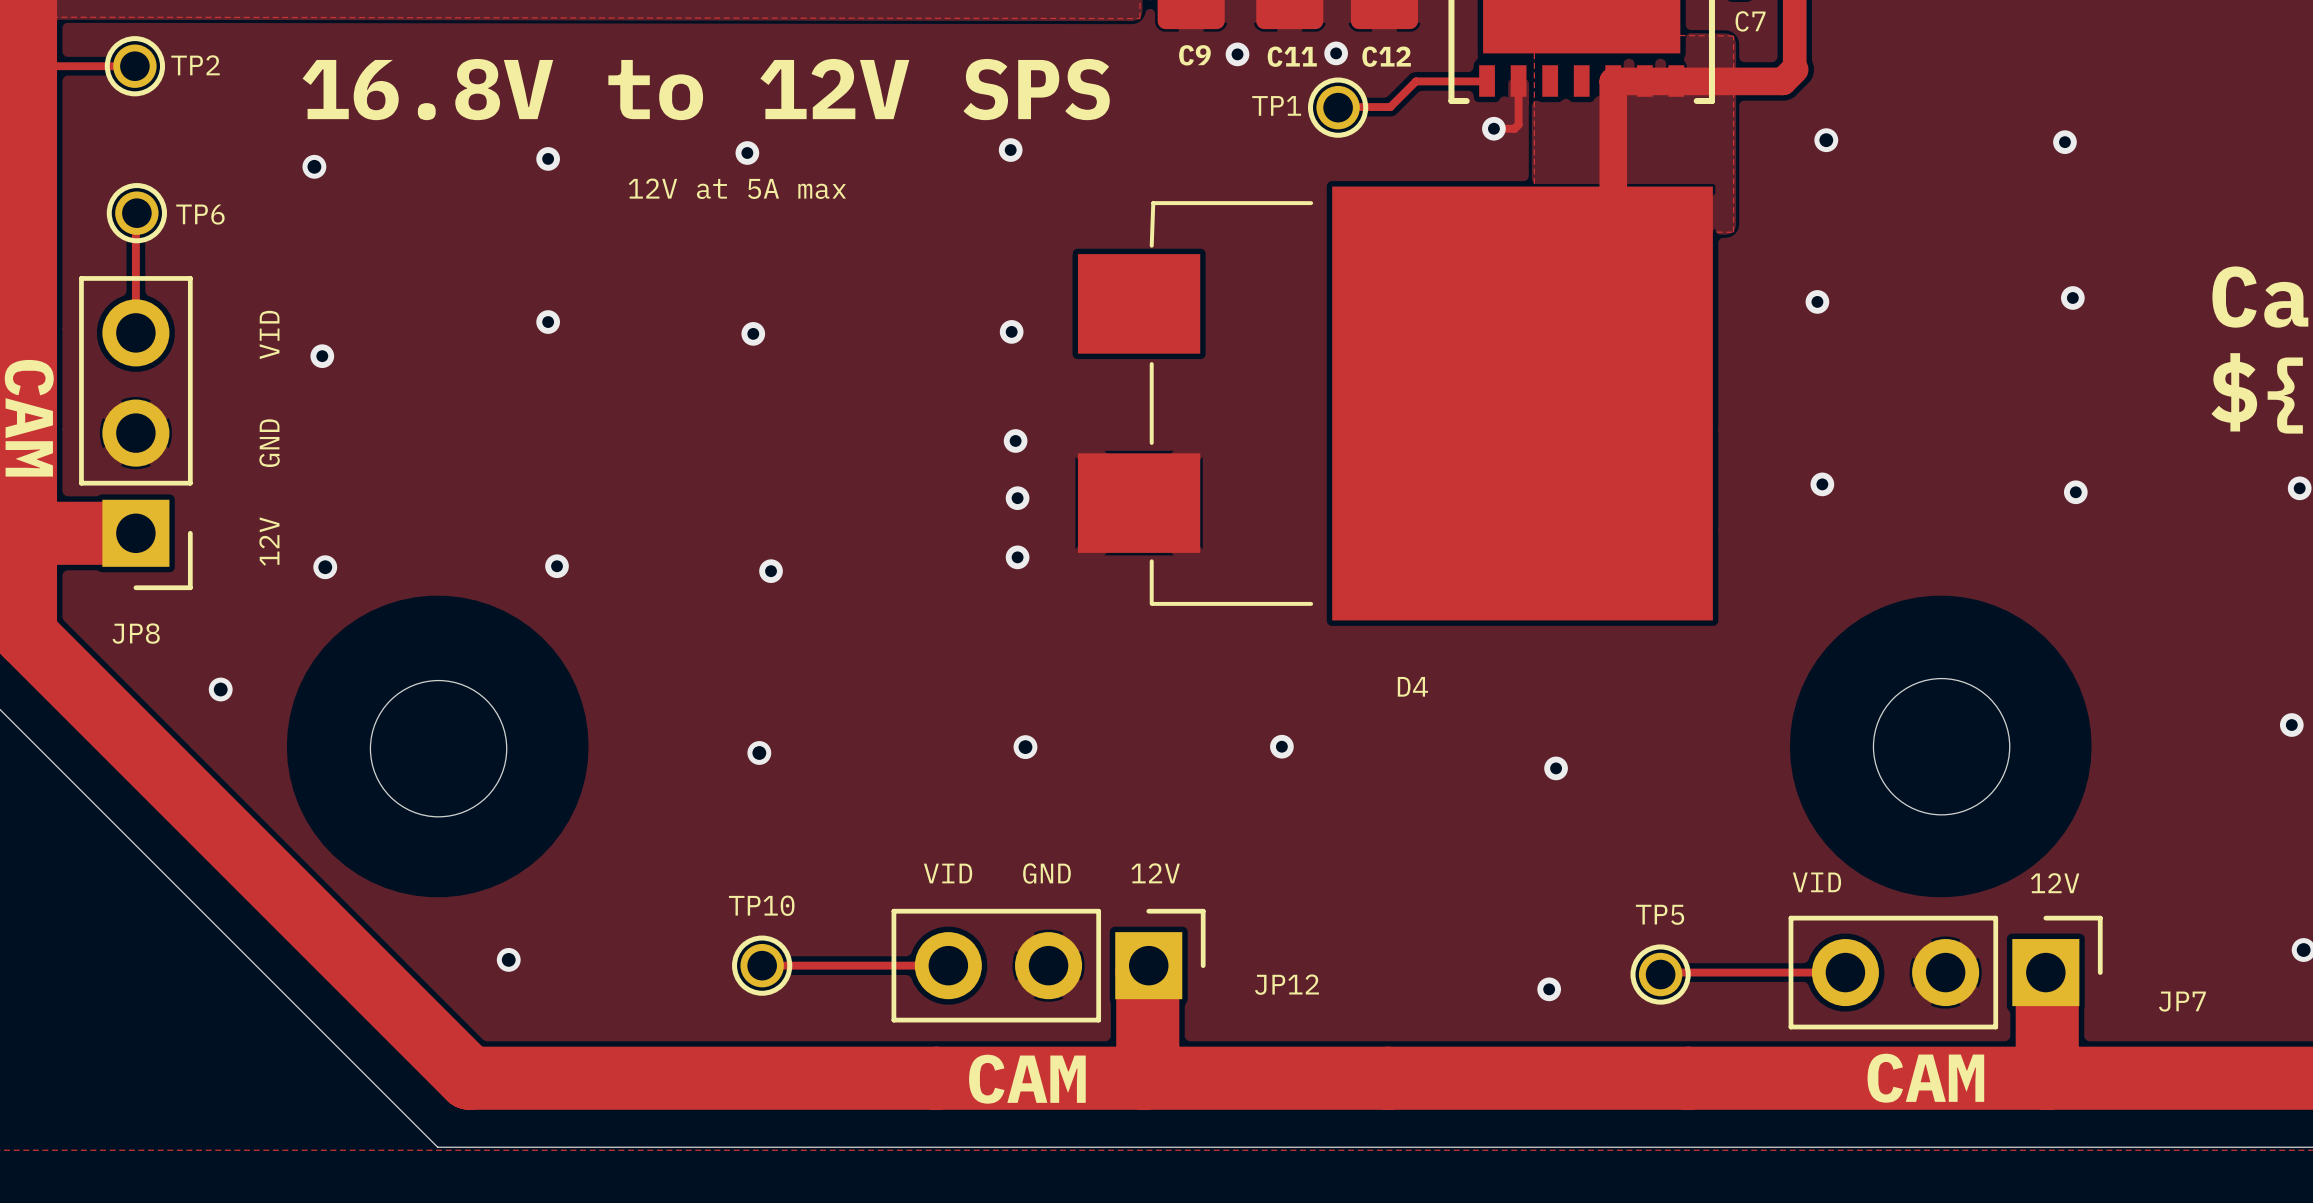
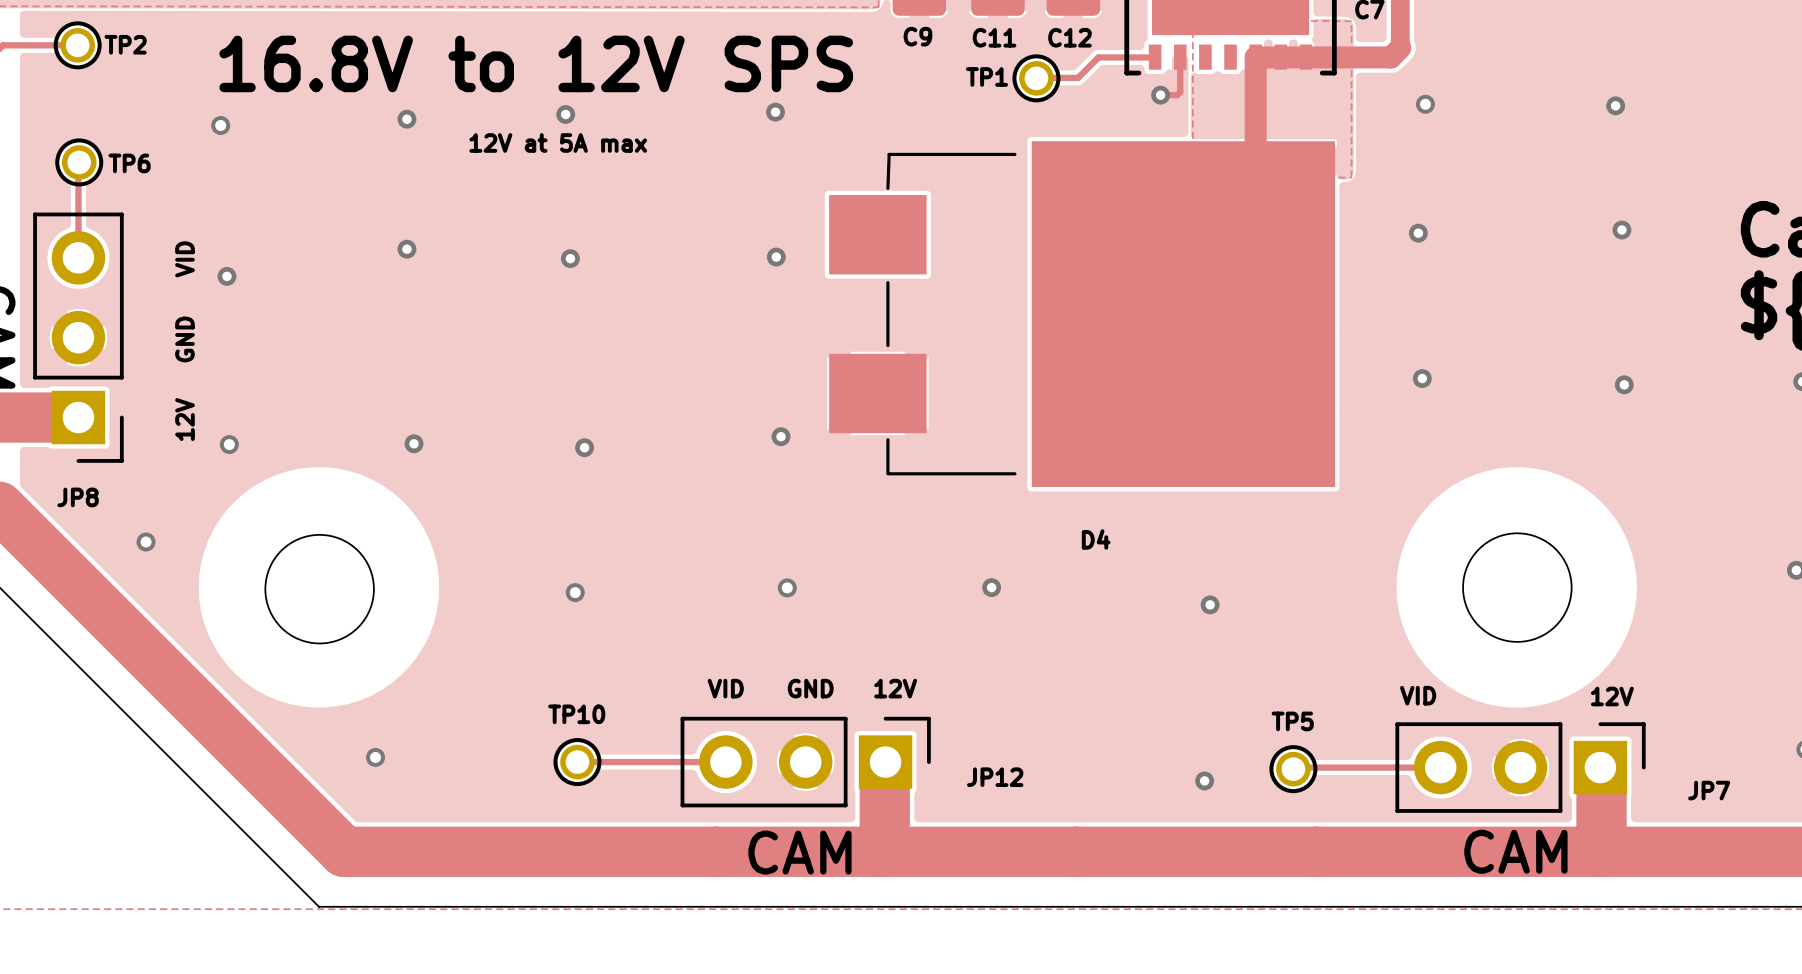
via: (1336, 53) -> none
via: (1237, 54) -> none
via: (1015, 440) -> none
via: (1017, 498) -> none

